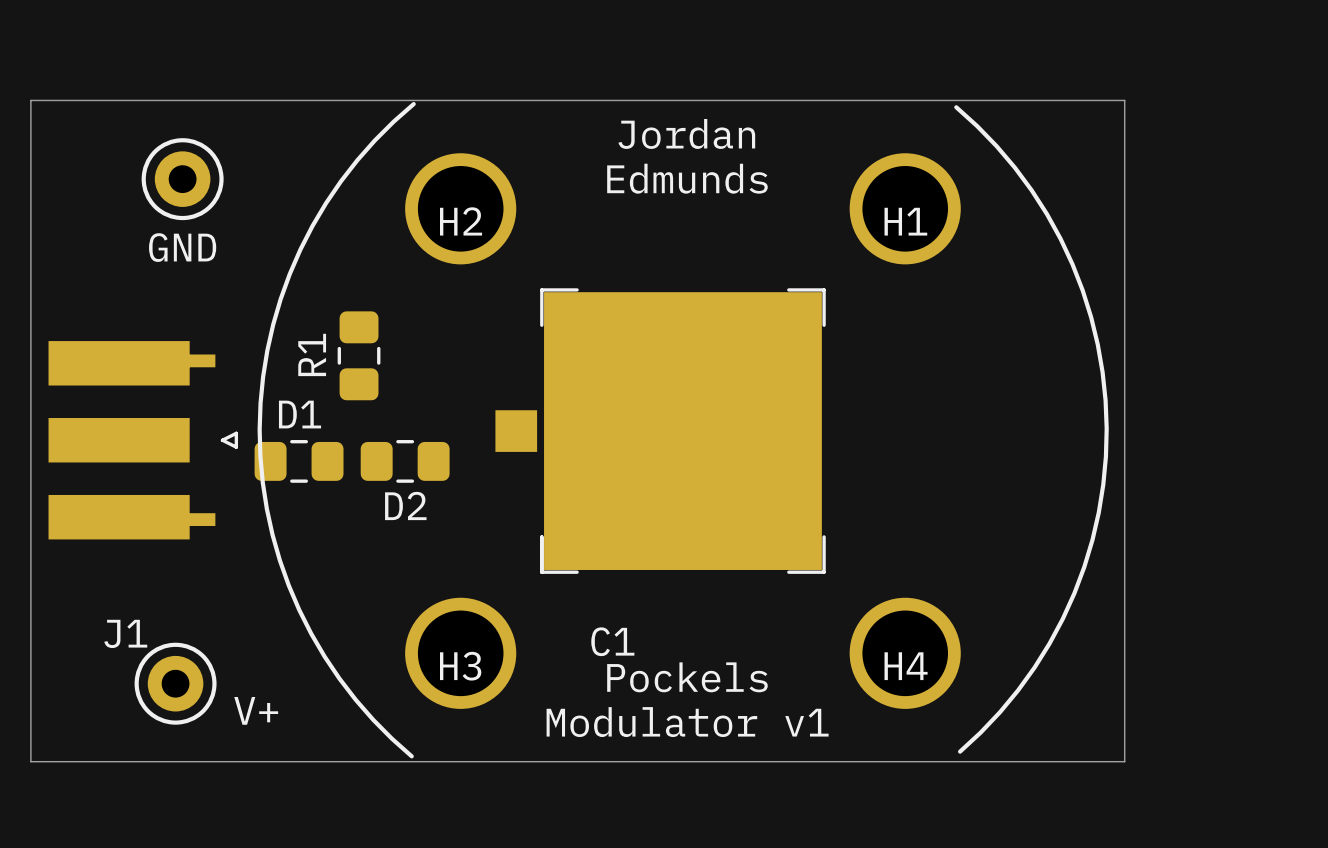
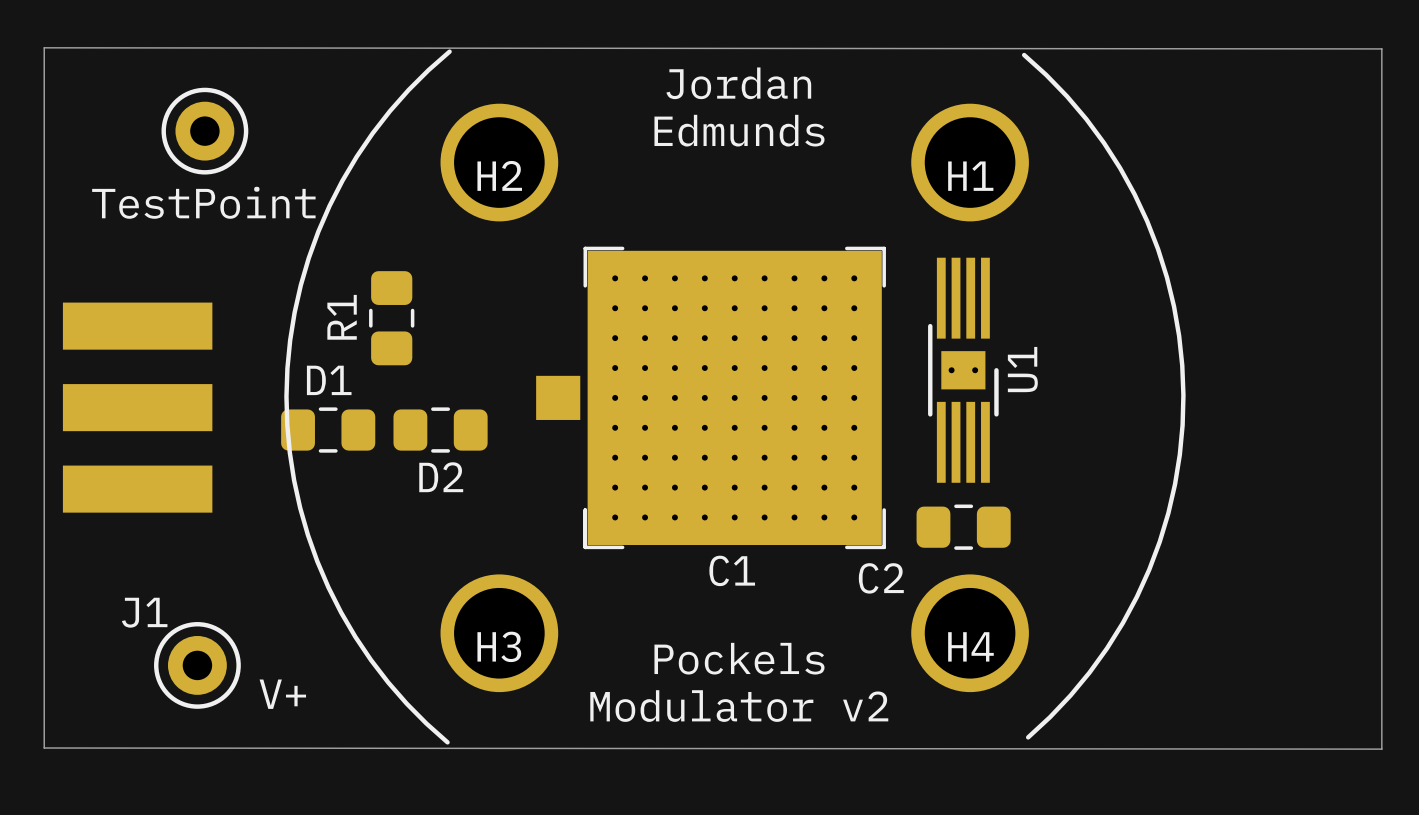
board edge: (30, 100) (1124, 100) (1124, 761) (30, 761) -> (44, 47) (1381, 48) (1381, 749) (44, 748)
part value: GND (182, 247) -> TestPoint (203, 202)
C1 footprint: [495, 288, 826, 574] -> [536, 246, 886, 550]
J1 footprint: [48, 341, 239, 540] -> [62, 302, 213, 513]
U1: none -> (963, 370)
C2: none -> (963, 527)
C1 name position: C1 (612, 641) -> C1 (732, 570)
text: Modulator v1 (687, 722) -> Modulator v2 (739, 706)

